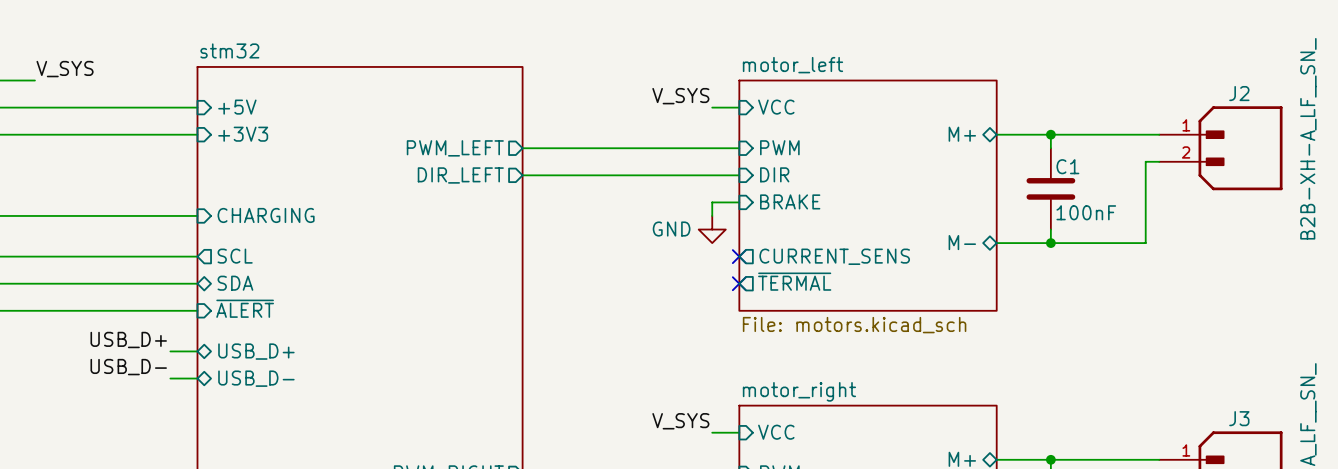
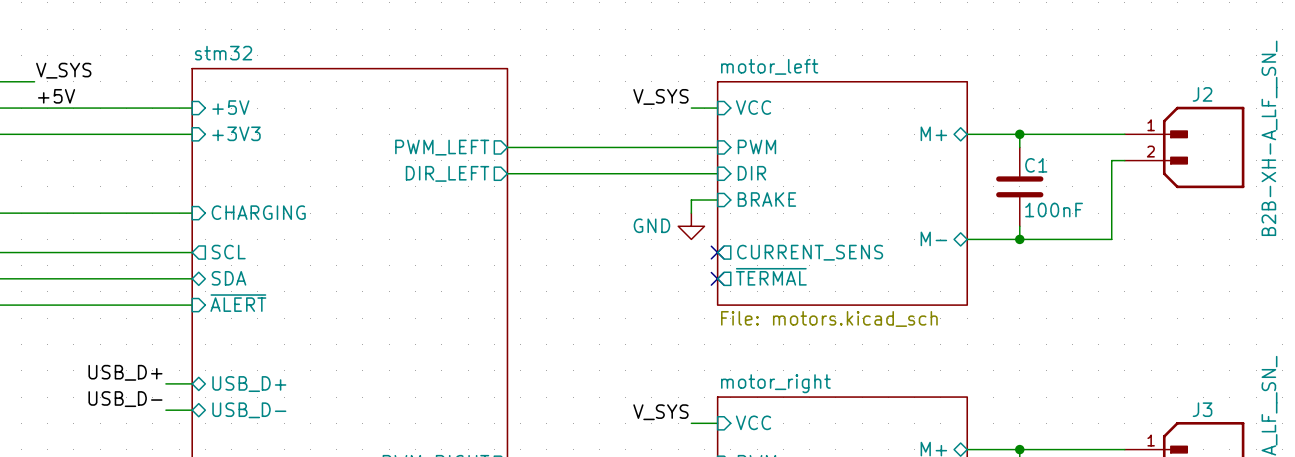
label: none -> +5V (56, 96)
label position: USB_D+ (128, 340) -> USB_D+ (125, 372)
wire: (170, 351) (197, 351) -> (165, 383) (192, 383)
sheet pin position: USB_D+ (256, 351) -> USB_D+ (249, 384)
label position: USB_D- (128, 367) -> USB_D- (125, 399)
wire: (170, 378) (197, 378) -> (165, 410) (192, 410)
sheet pin position: USB_D- (256, 378) -> USB_D- (249, 410)

